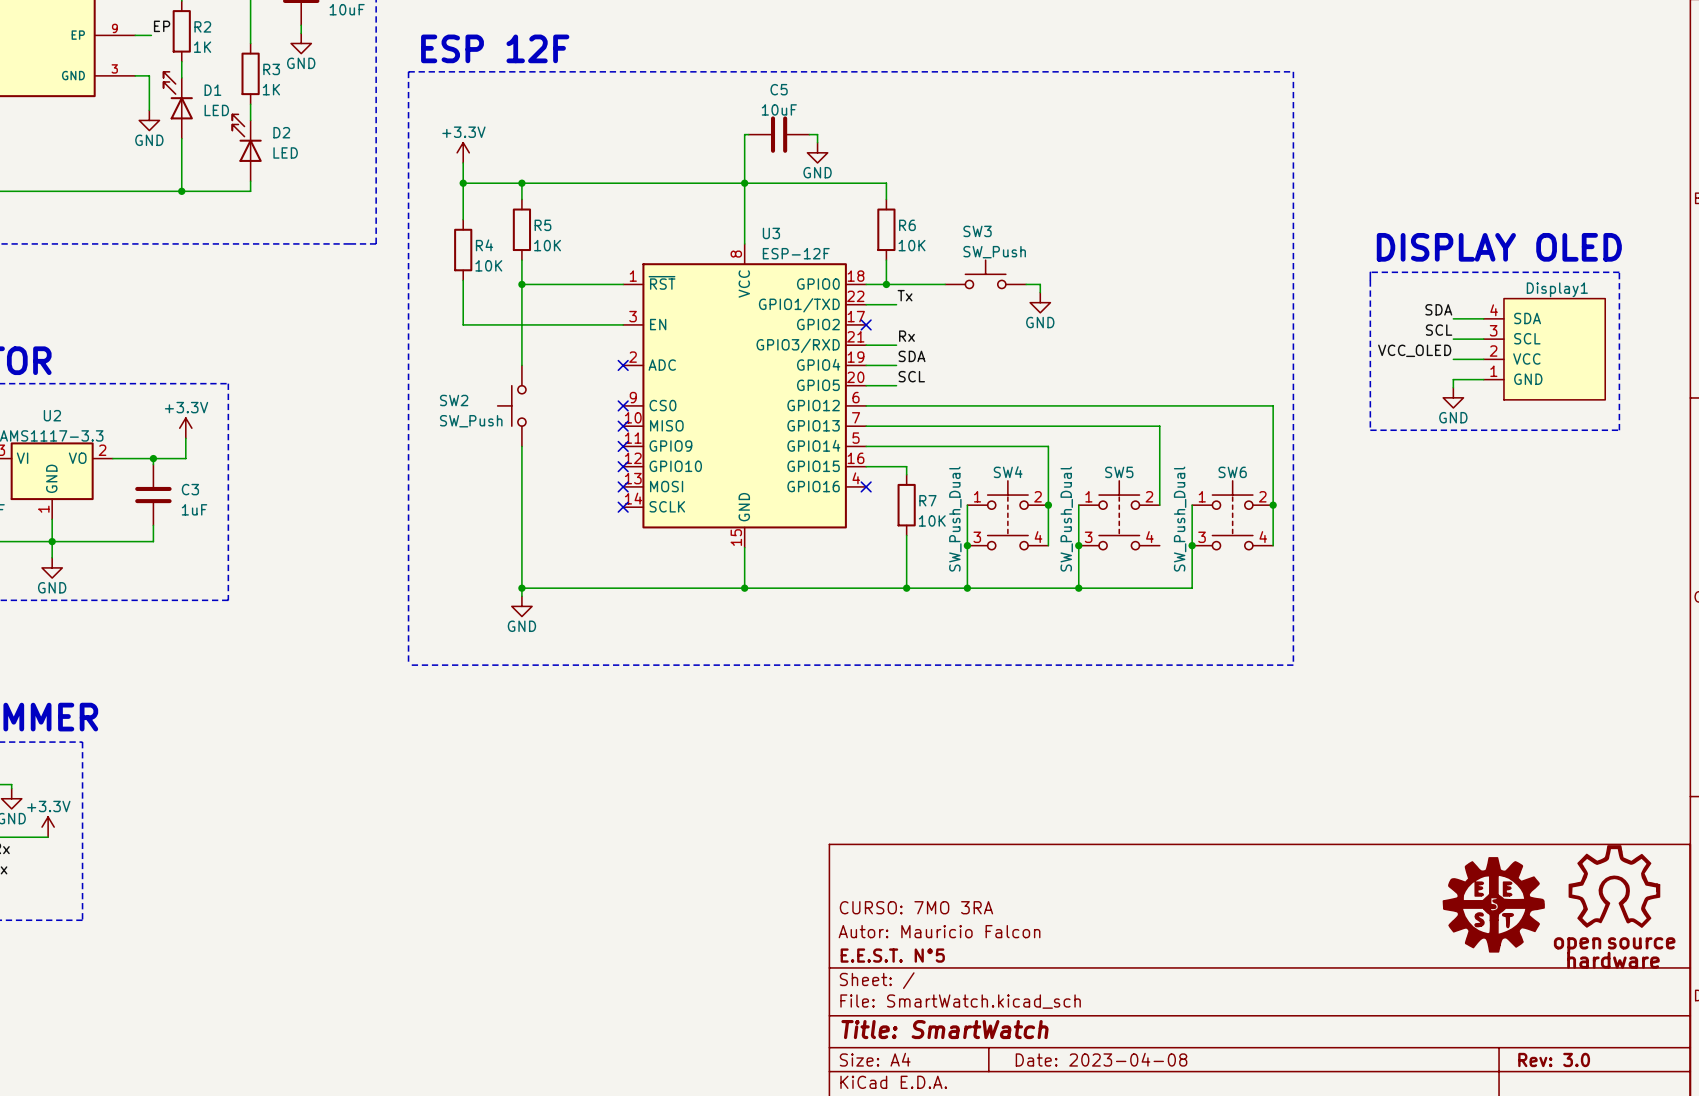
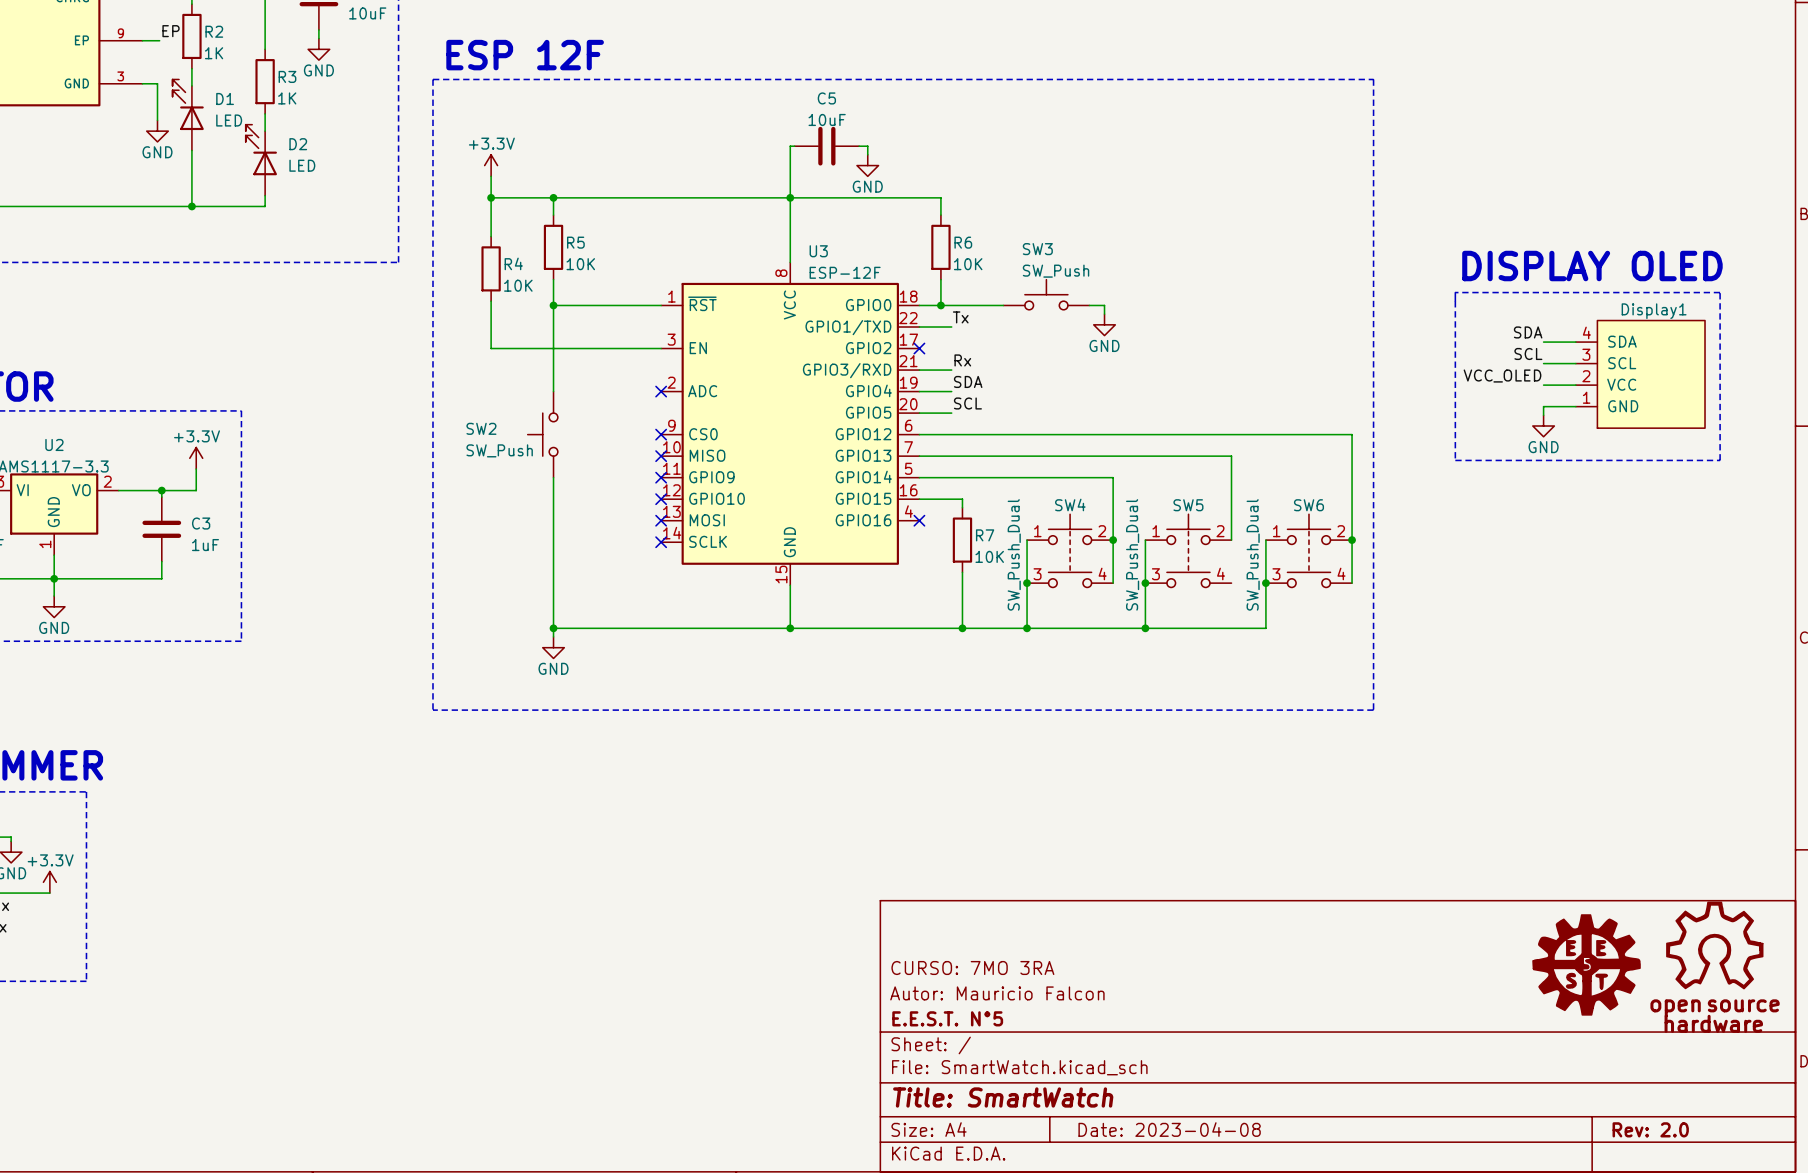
title block: Rev: 3.0 (1554, 1059) -> Rev: 2.0 (1650, 1129)

